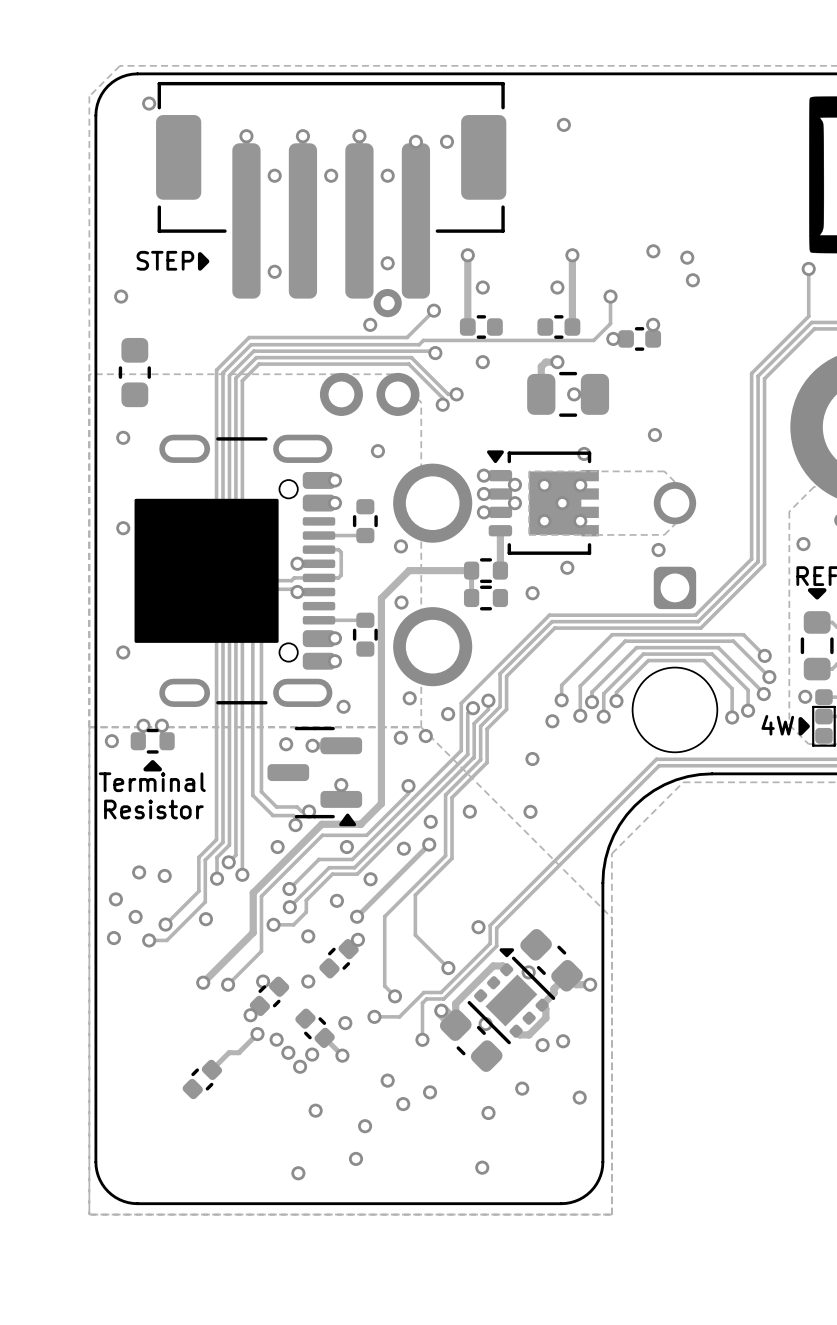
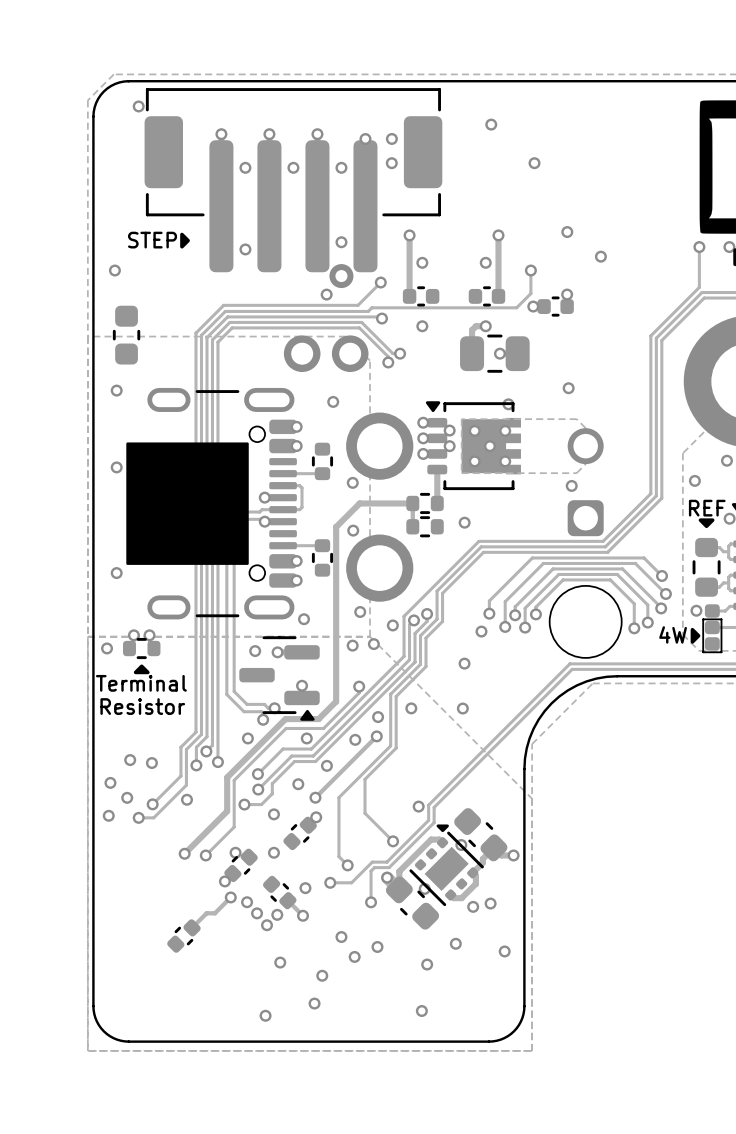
via: none -> (391, 163)
via position: (687, 257) -> (534, 163)
via: (567, 567) -> none

